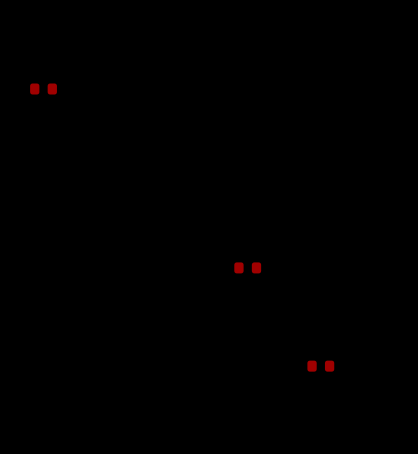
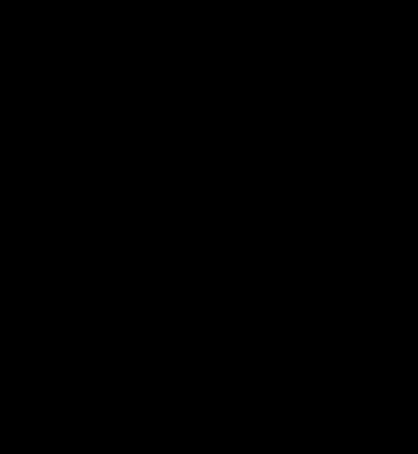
part: (43, 89) -> none
part: (247, 267) -> none
part: (320, 366) -> none

